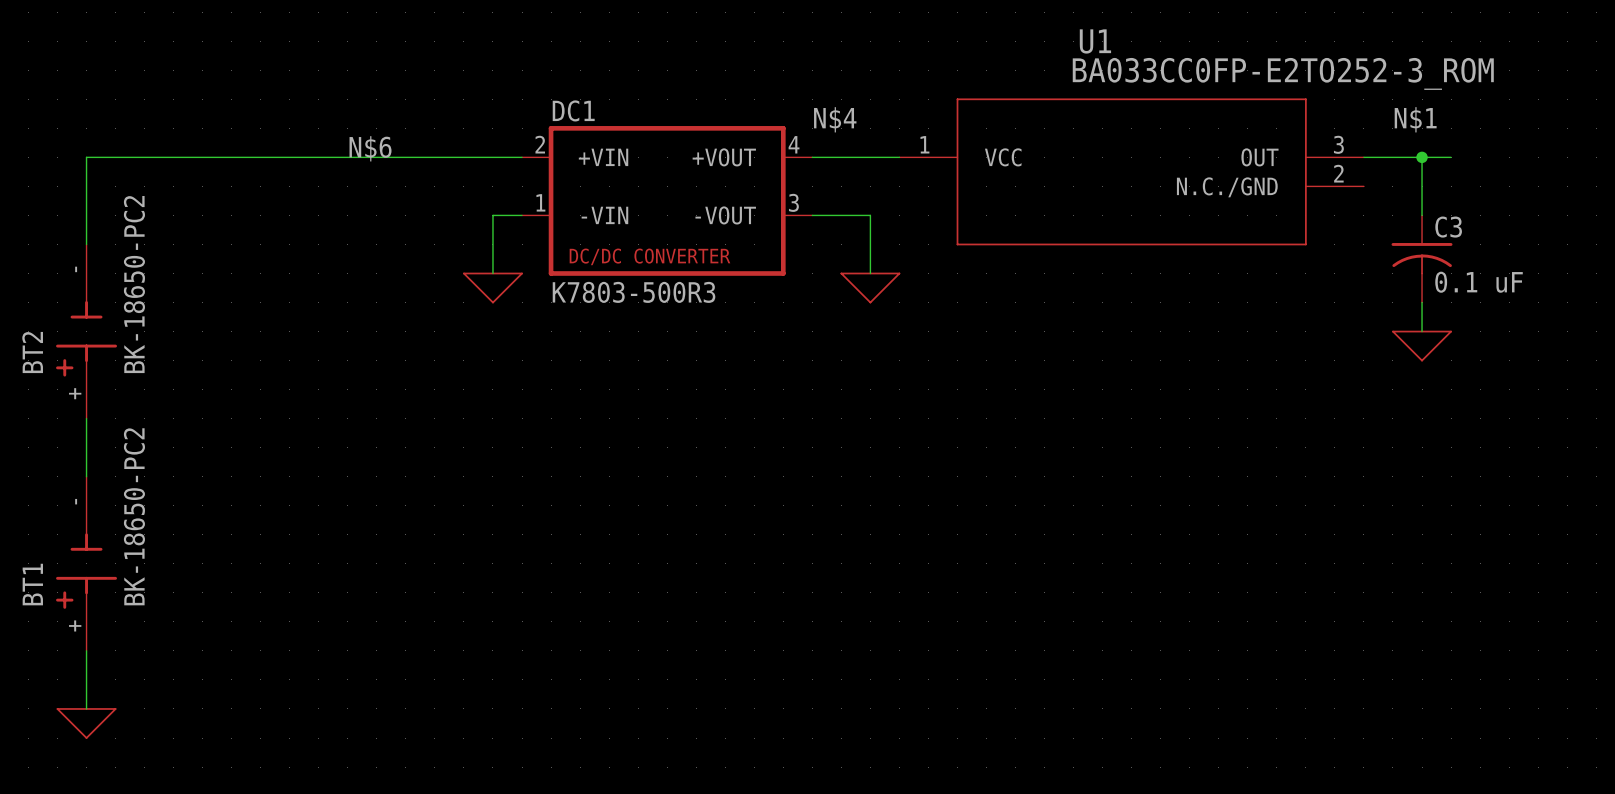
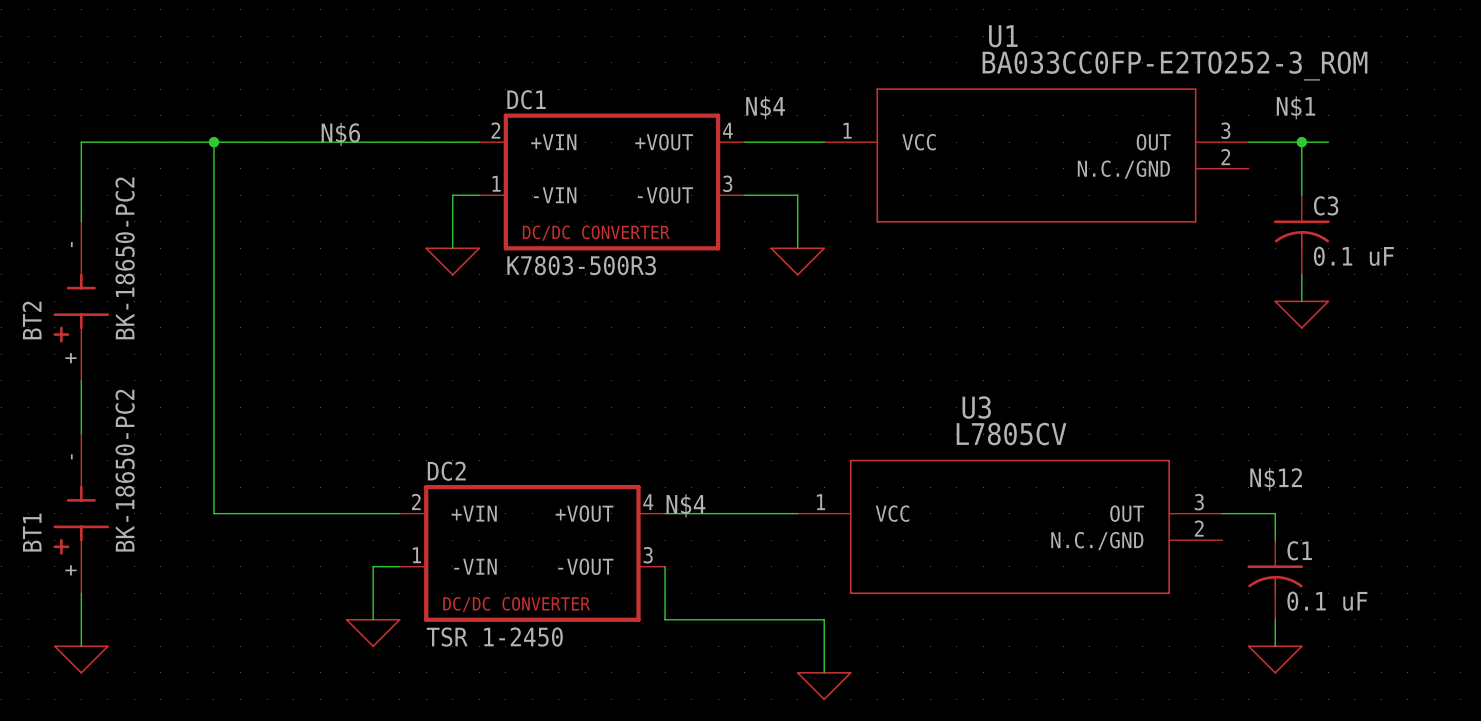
wire: none -> (213, 142) (213, 513) (399, 513)
junction: none -> (213, 142)
label: none -> N$12 (1276, 479)
label: none -> N$4 (685, 505)
wire: none -> (665, 513) (797, 513)
wire: none -> (1222, 513) (1275, 513) (1275, 540)
U3: none -> L7805CV (1009, 526)
DC2: none -> TSR 1-2450 (532, 553)
wire: none -> (399, 566) (373, 566) (373, 619)
wire: none -> (665, 566) (665, 619) (824, 619) (824, 672)
C1: none -> 0.1 uF (1275, 579)
wire: none -> (1275, 619) (1275, 646)
power symbol: none -> (373, 633)
power symbol: none -> (1275, 659)
power symbol: none -> (824, 686)

